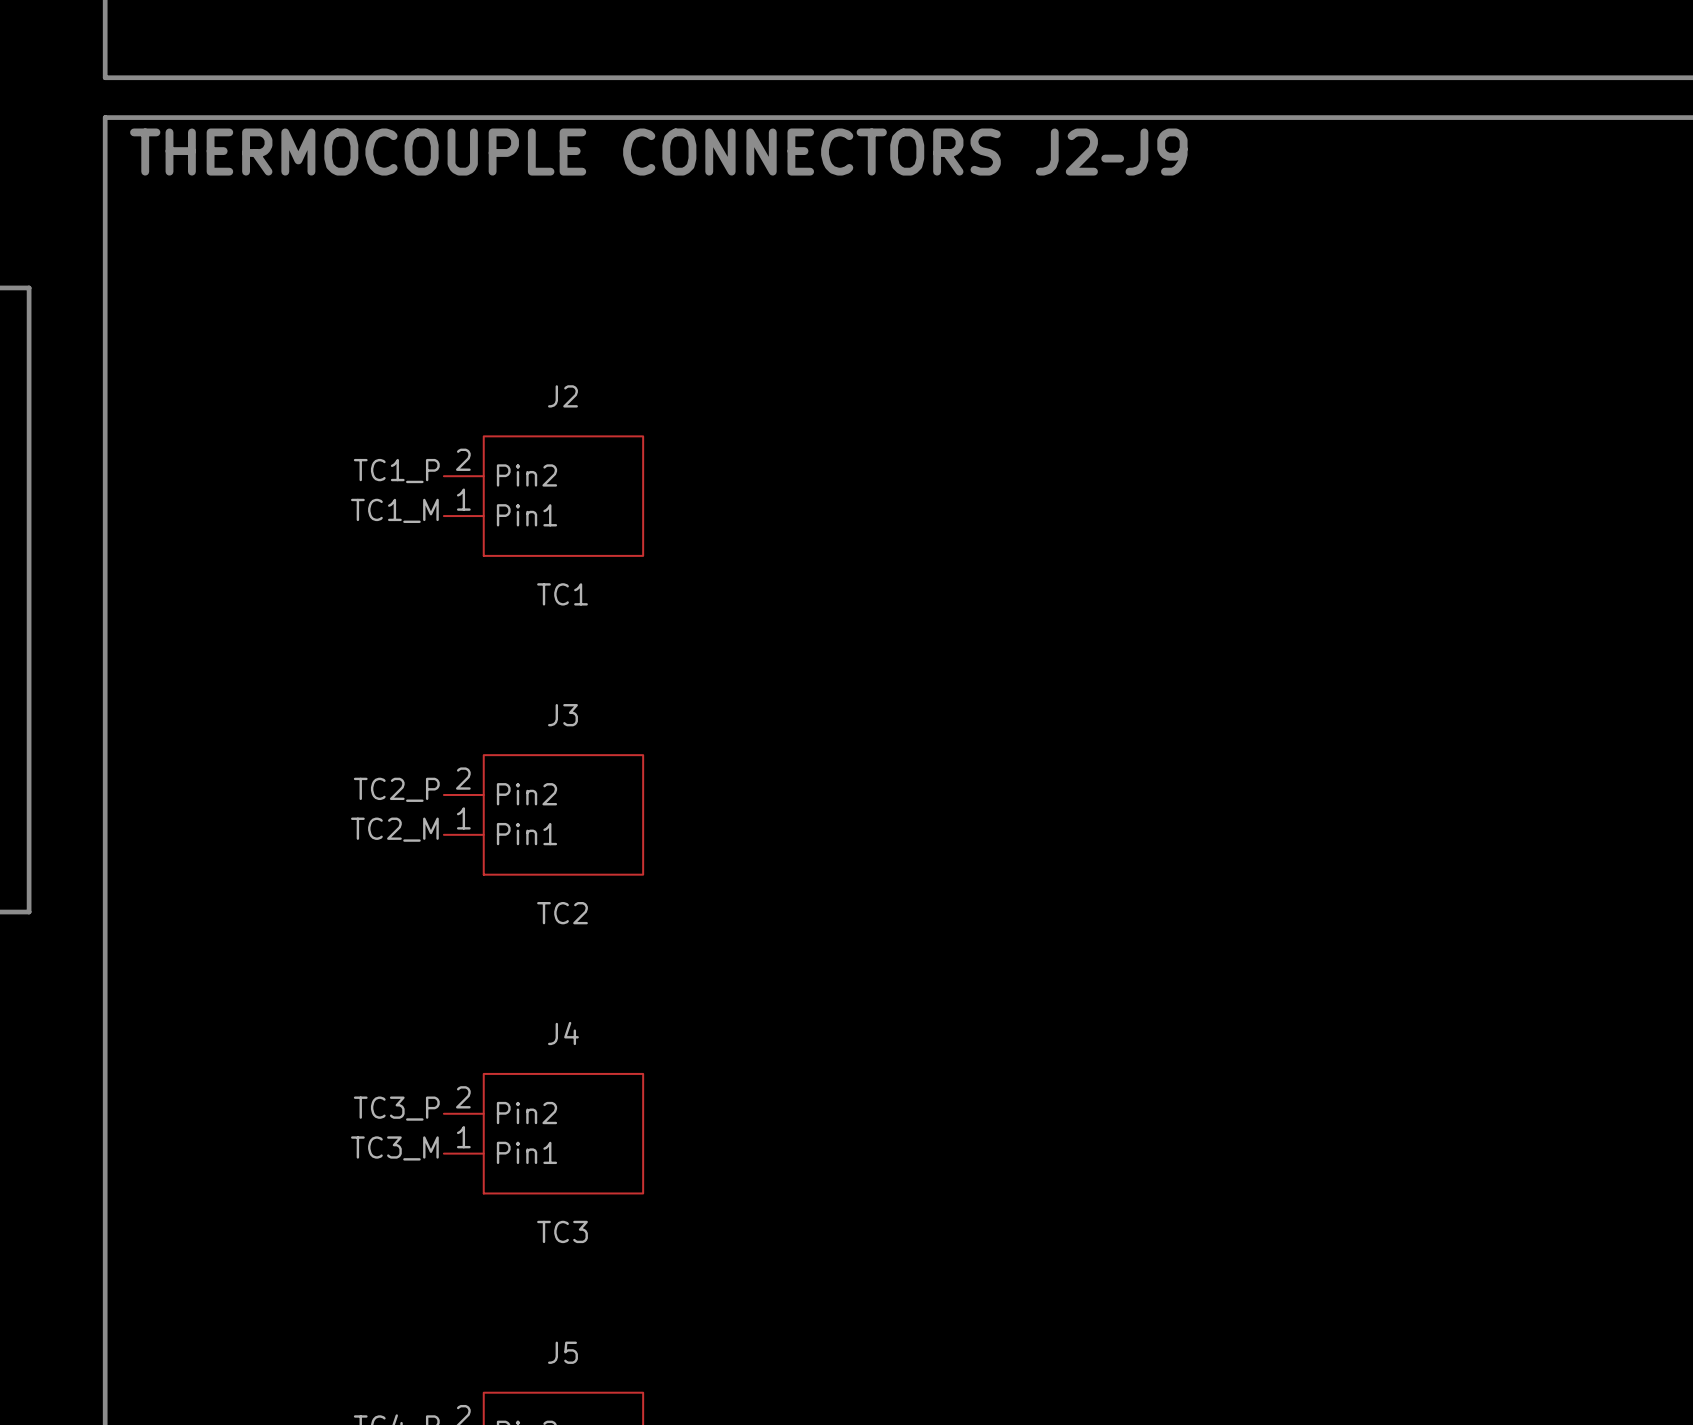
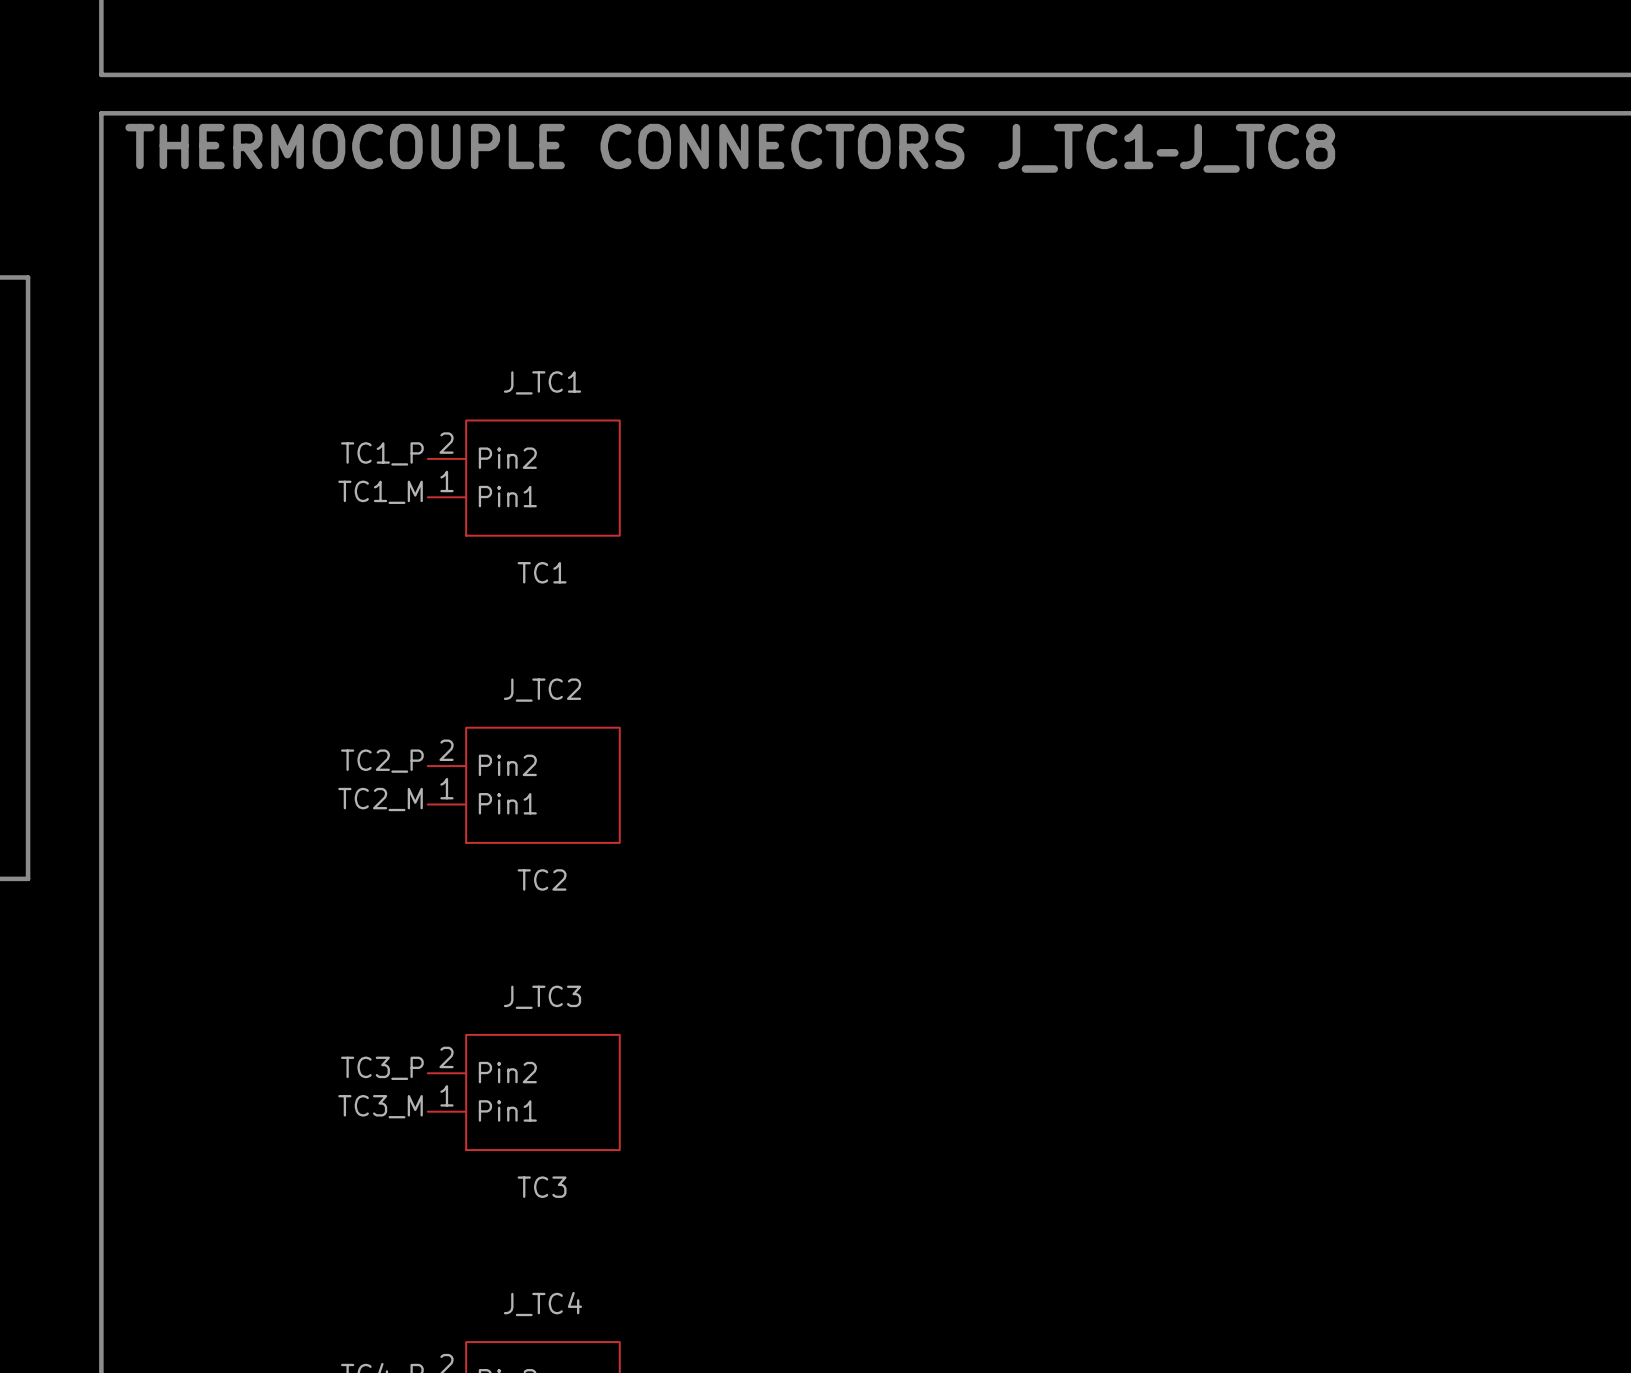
text: THERMOCOUPLE CONNECTORS J2–J9 (658, 152) -> THERMOCOUPLE CONNECTORS J_TC1–J_TC8 (730, 148)
J2 name: J2 (562, 396) -> J_TC1 (542, 382)
J3 name: J3 (562, 715) -> J_TC2 (542, 690)
J4 name: J4 (563, 1033) -> J_TC3 (542, 997)
J5 name: J5 (562, 1352) -> J_TC4 (542, 1304)

